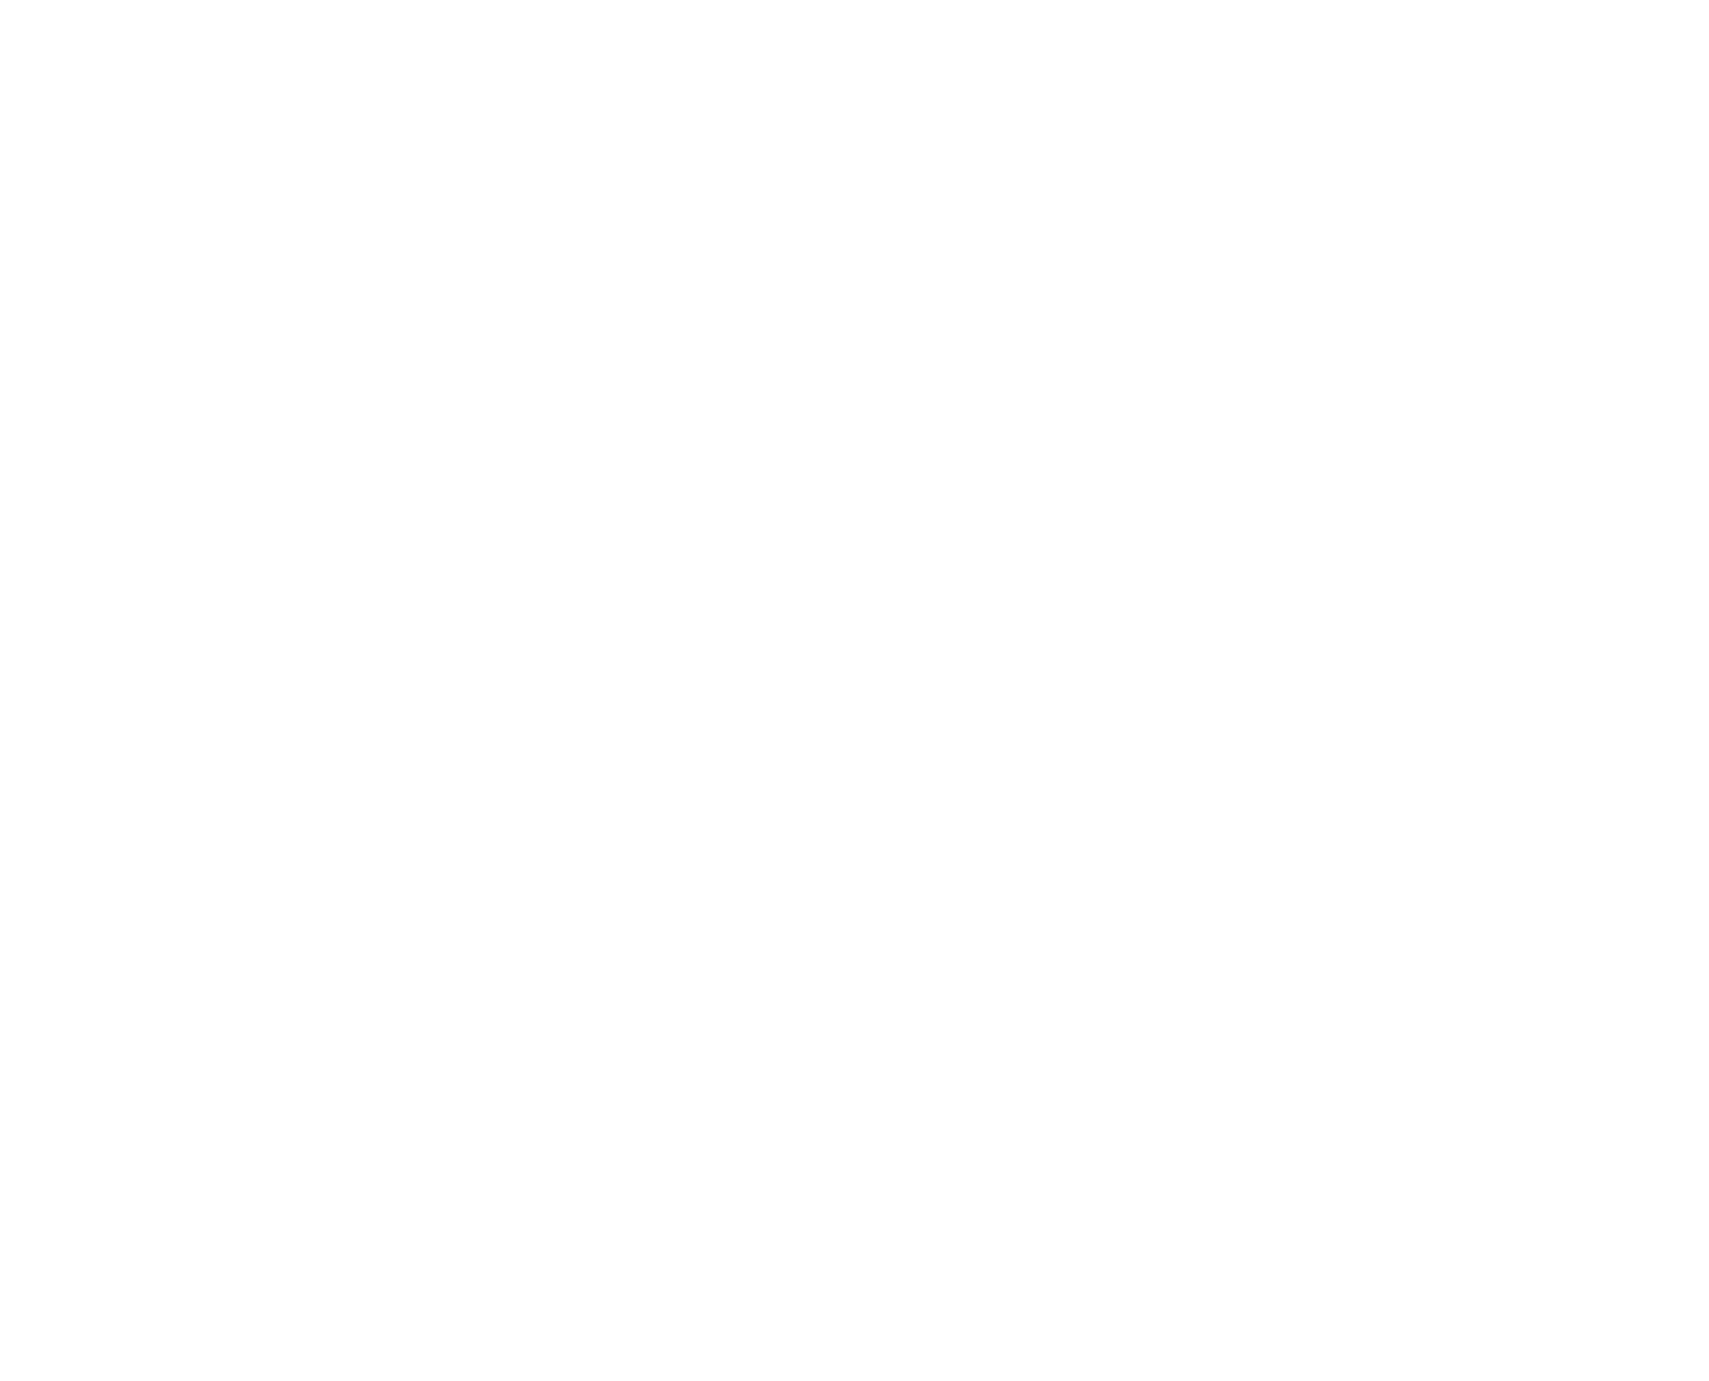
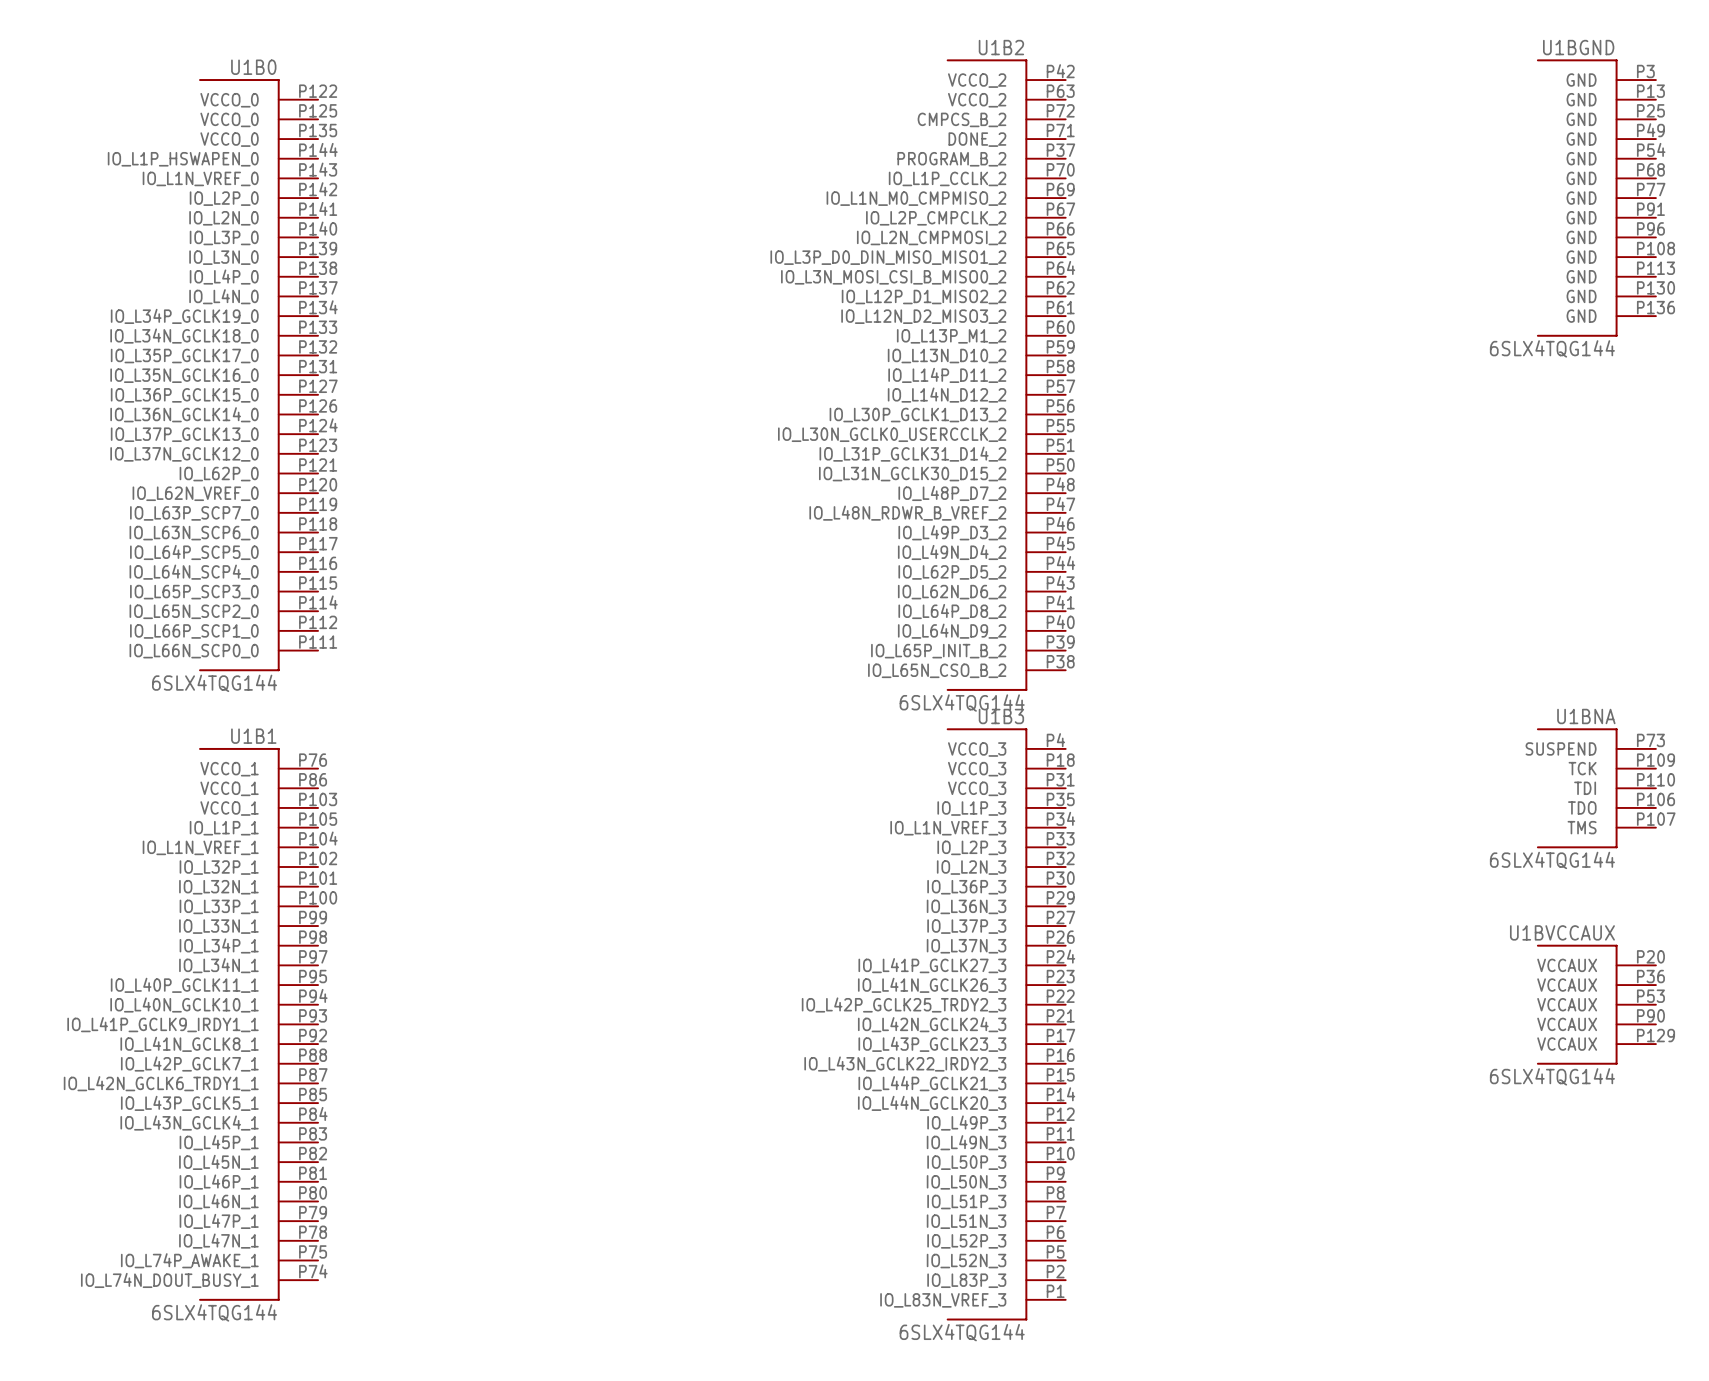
U1BGND: none -> 6SLX4TQG144 (1596, 198)
U1B0: none -> 6SLX4TQG144 (258, 375)
U1B2: none -> 6SLX4TQG144 (1006, 375)
U1BNA: none -> 6SLX4TQG144 (1596, 788)
U1BVCCAUX: none -> 6SLX4TQG144 (1596, 1004)
U1B1: none -> 6SLX4TQG144 (258, 1024)
U1B3: none -> 6SLX4TQG144 (1006, 1024)

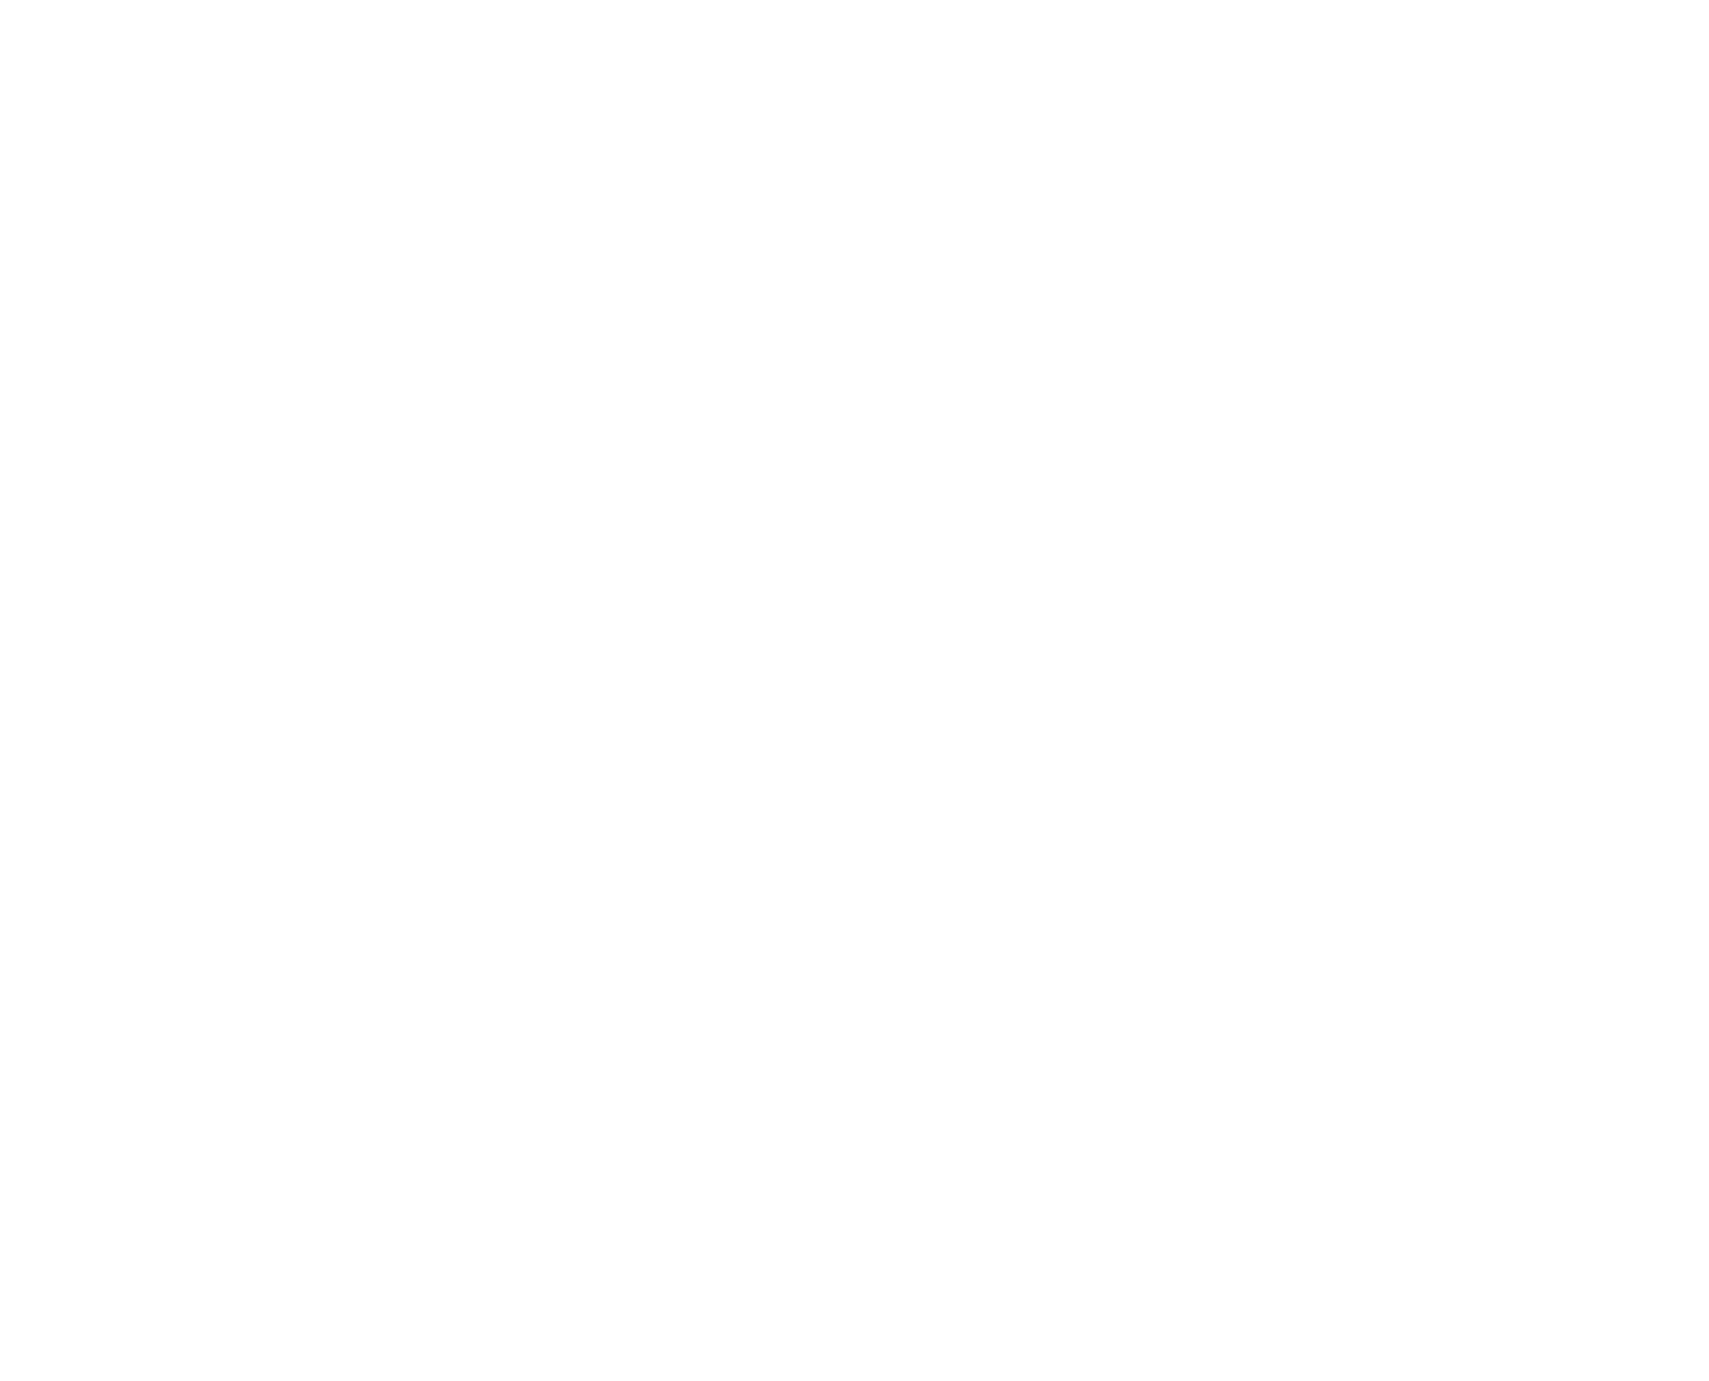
U1BGND: 6SLX4TQG144 (1596, 198) -> none
U1B0: 6SLX4TQG144 (258, 375) -> none
U1B2: 6SLX4TQG144 (1006, 375) -> none
U1BNA: 6SLX4TQG144 (1596, 788) -> none
U1BVCCAUX: 6SLX4TQG144 (1596, 1004) -> none
U1B1: 6SLX4TQG144 (258, 1024) -> none
U1B3: 6SLX4TQG144 (1006, 1024) -> none

